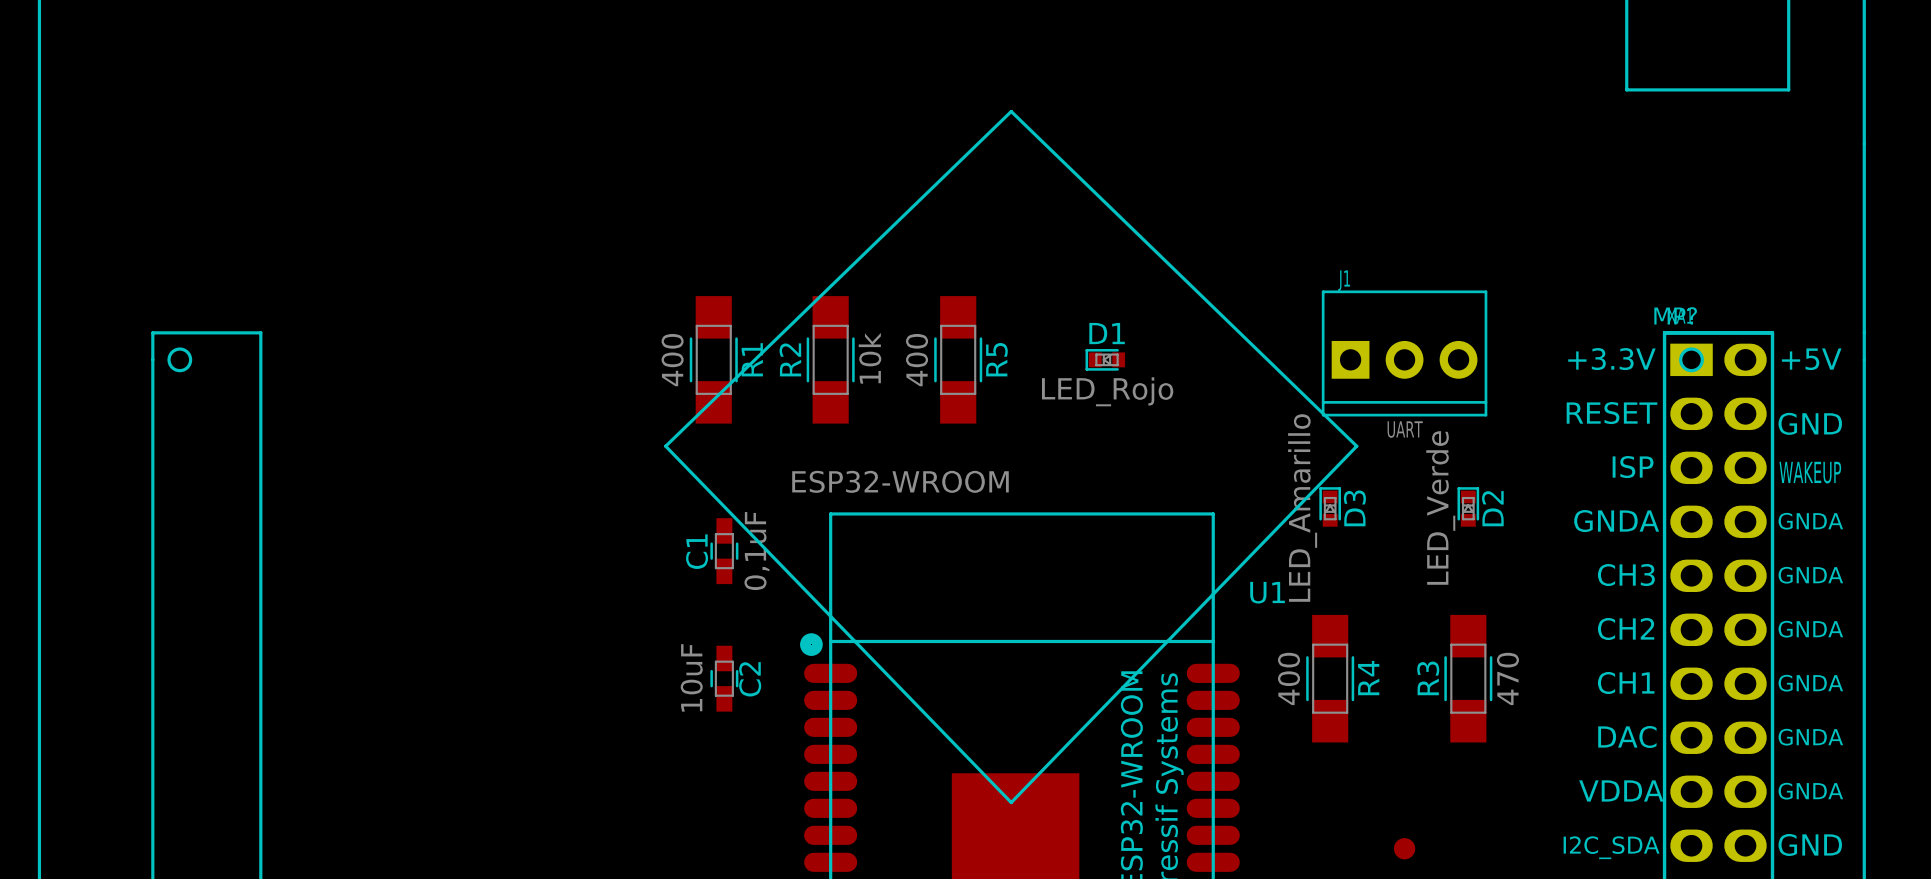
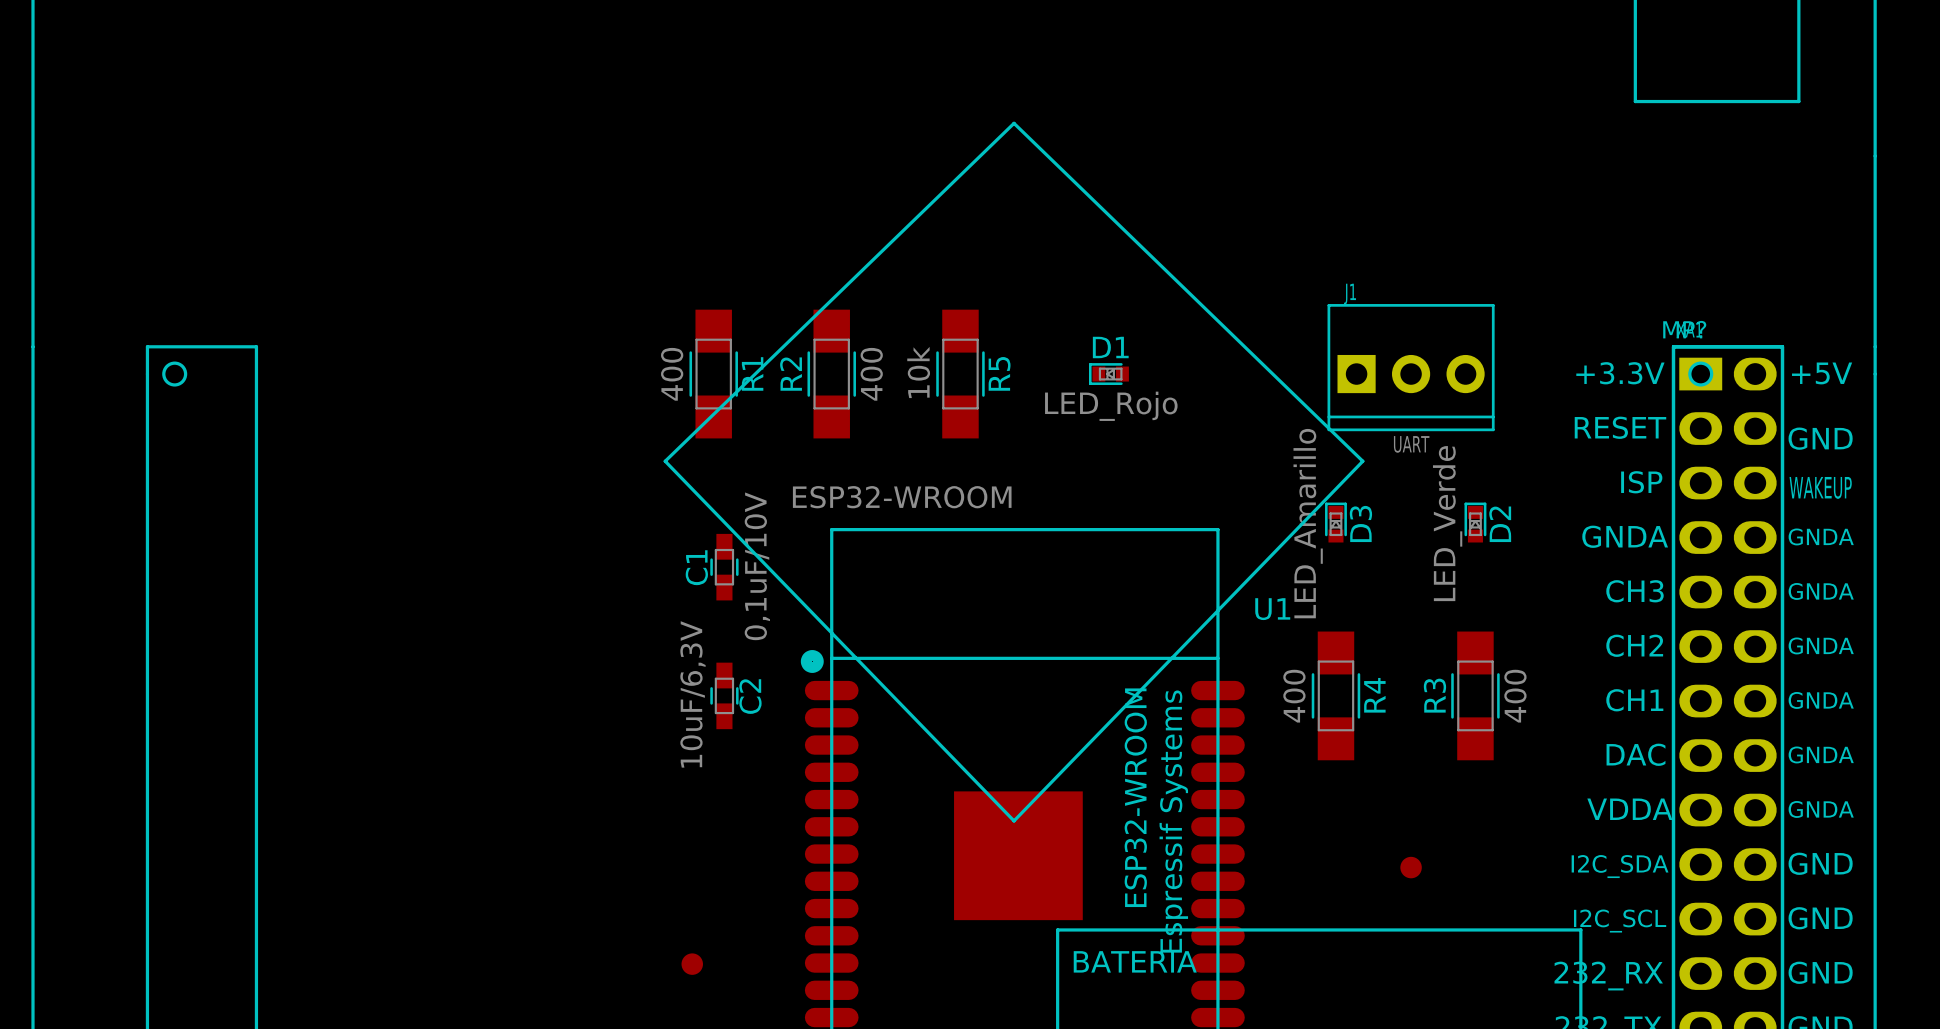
R2 value: 10k (870, 358) -> 400 (871, 374)
R5 value: 400 (917, 360) -> 10k (918, 372)
C1 value: 0,1uF (756, 551) -> 0,1uF/10V (757, 566)
C2 value: 10uF (691, 677) -> 10uF/6,3V (692, 694)
R3 value: 470 (1507, 678) -> 400 (1515, 696)

